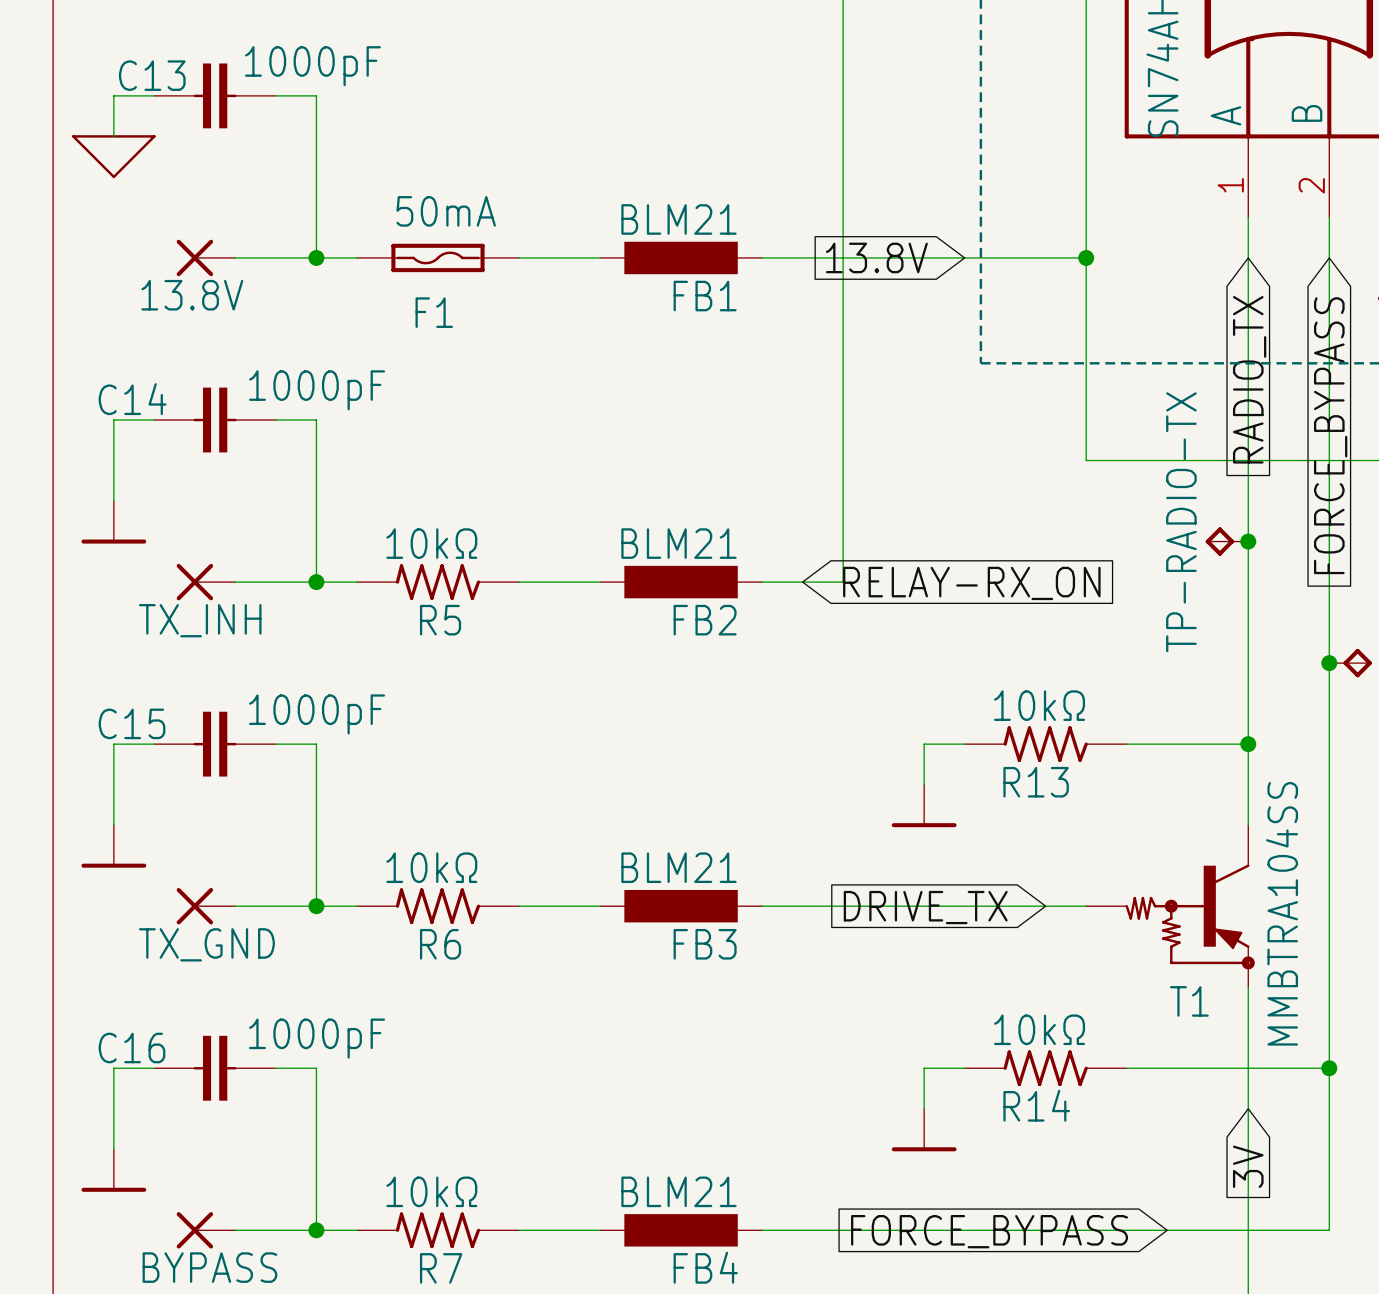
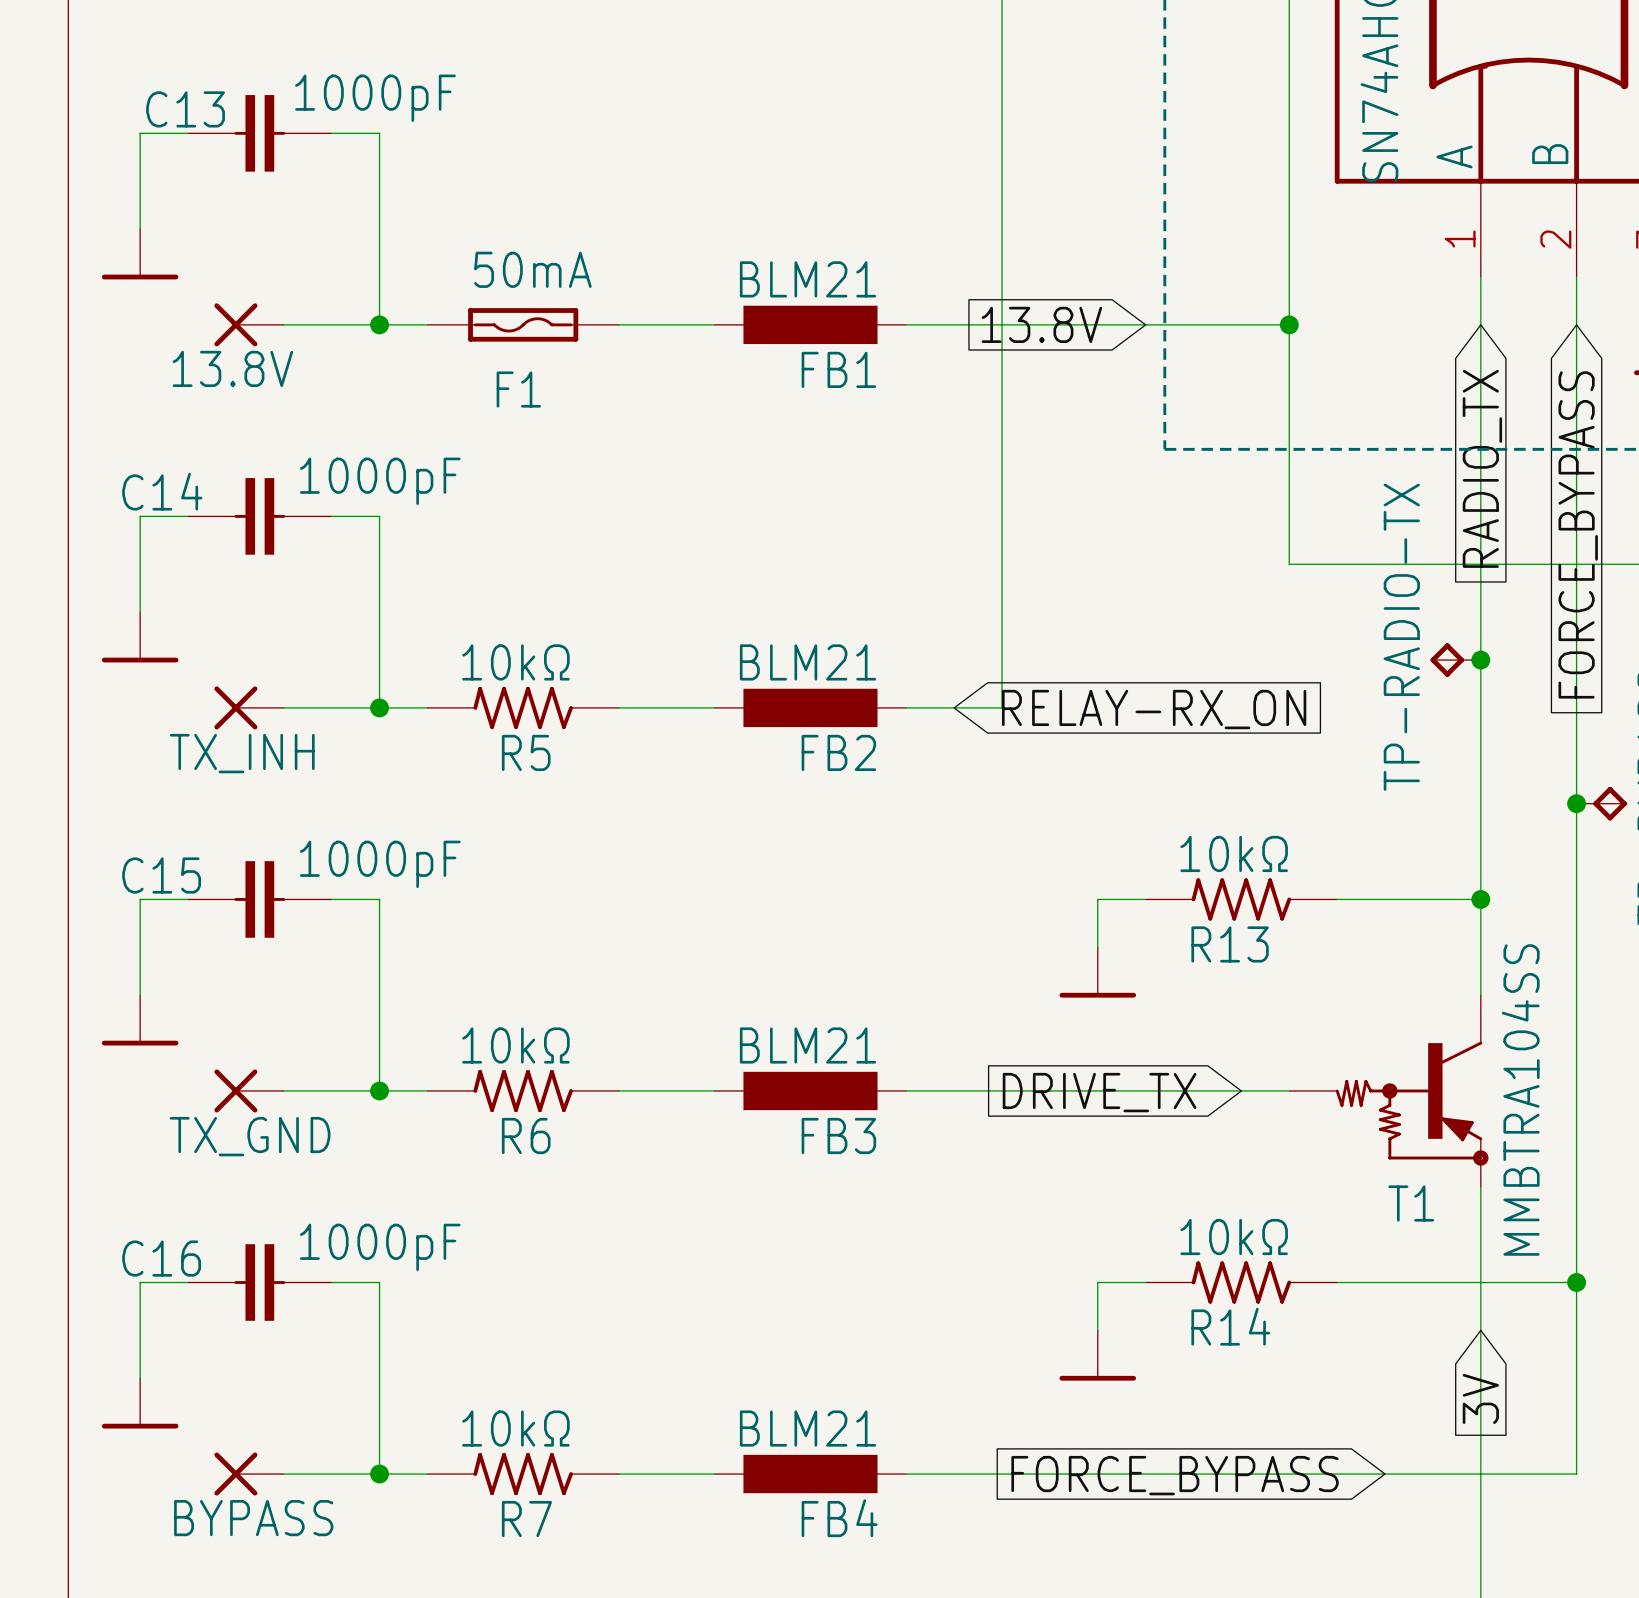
wire: none -> (140, 181) (140, 229)
power symbol: (113, 156) -> none
power symbol: none -> (140, 254)

